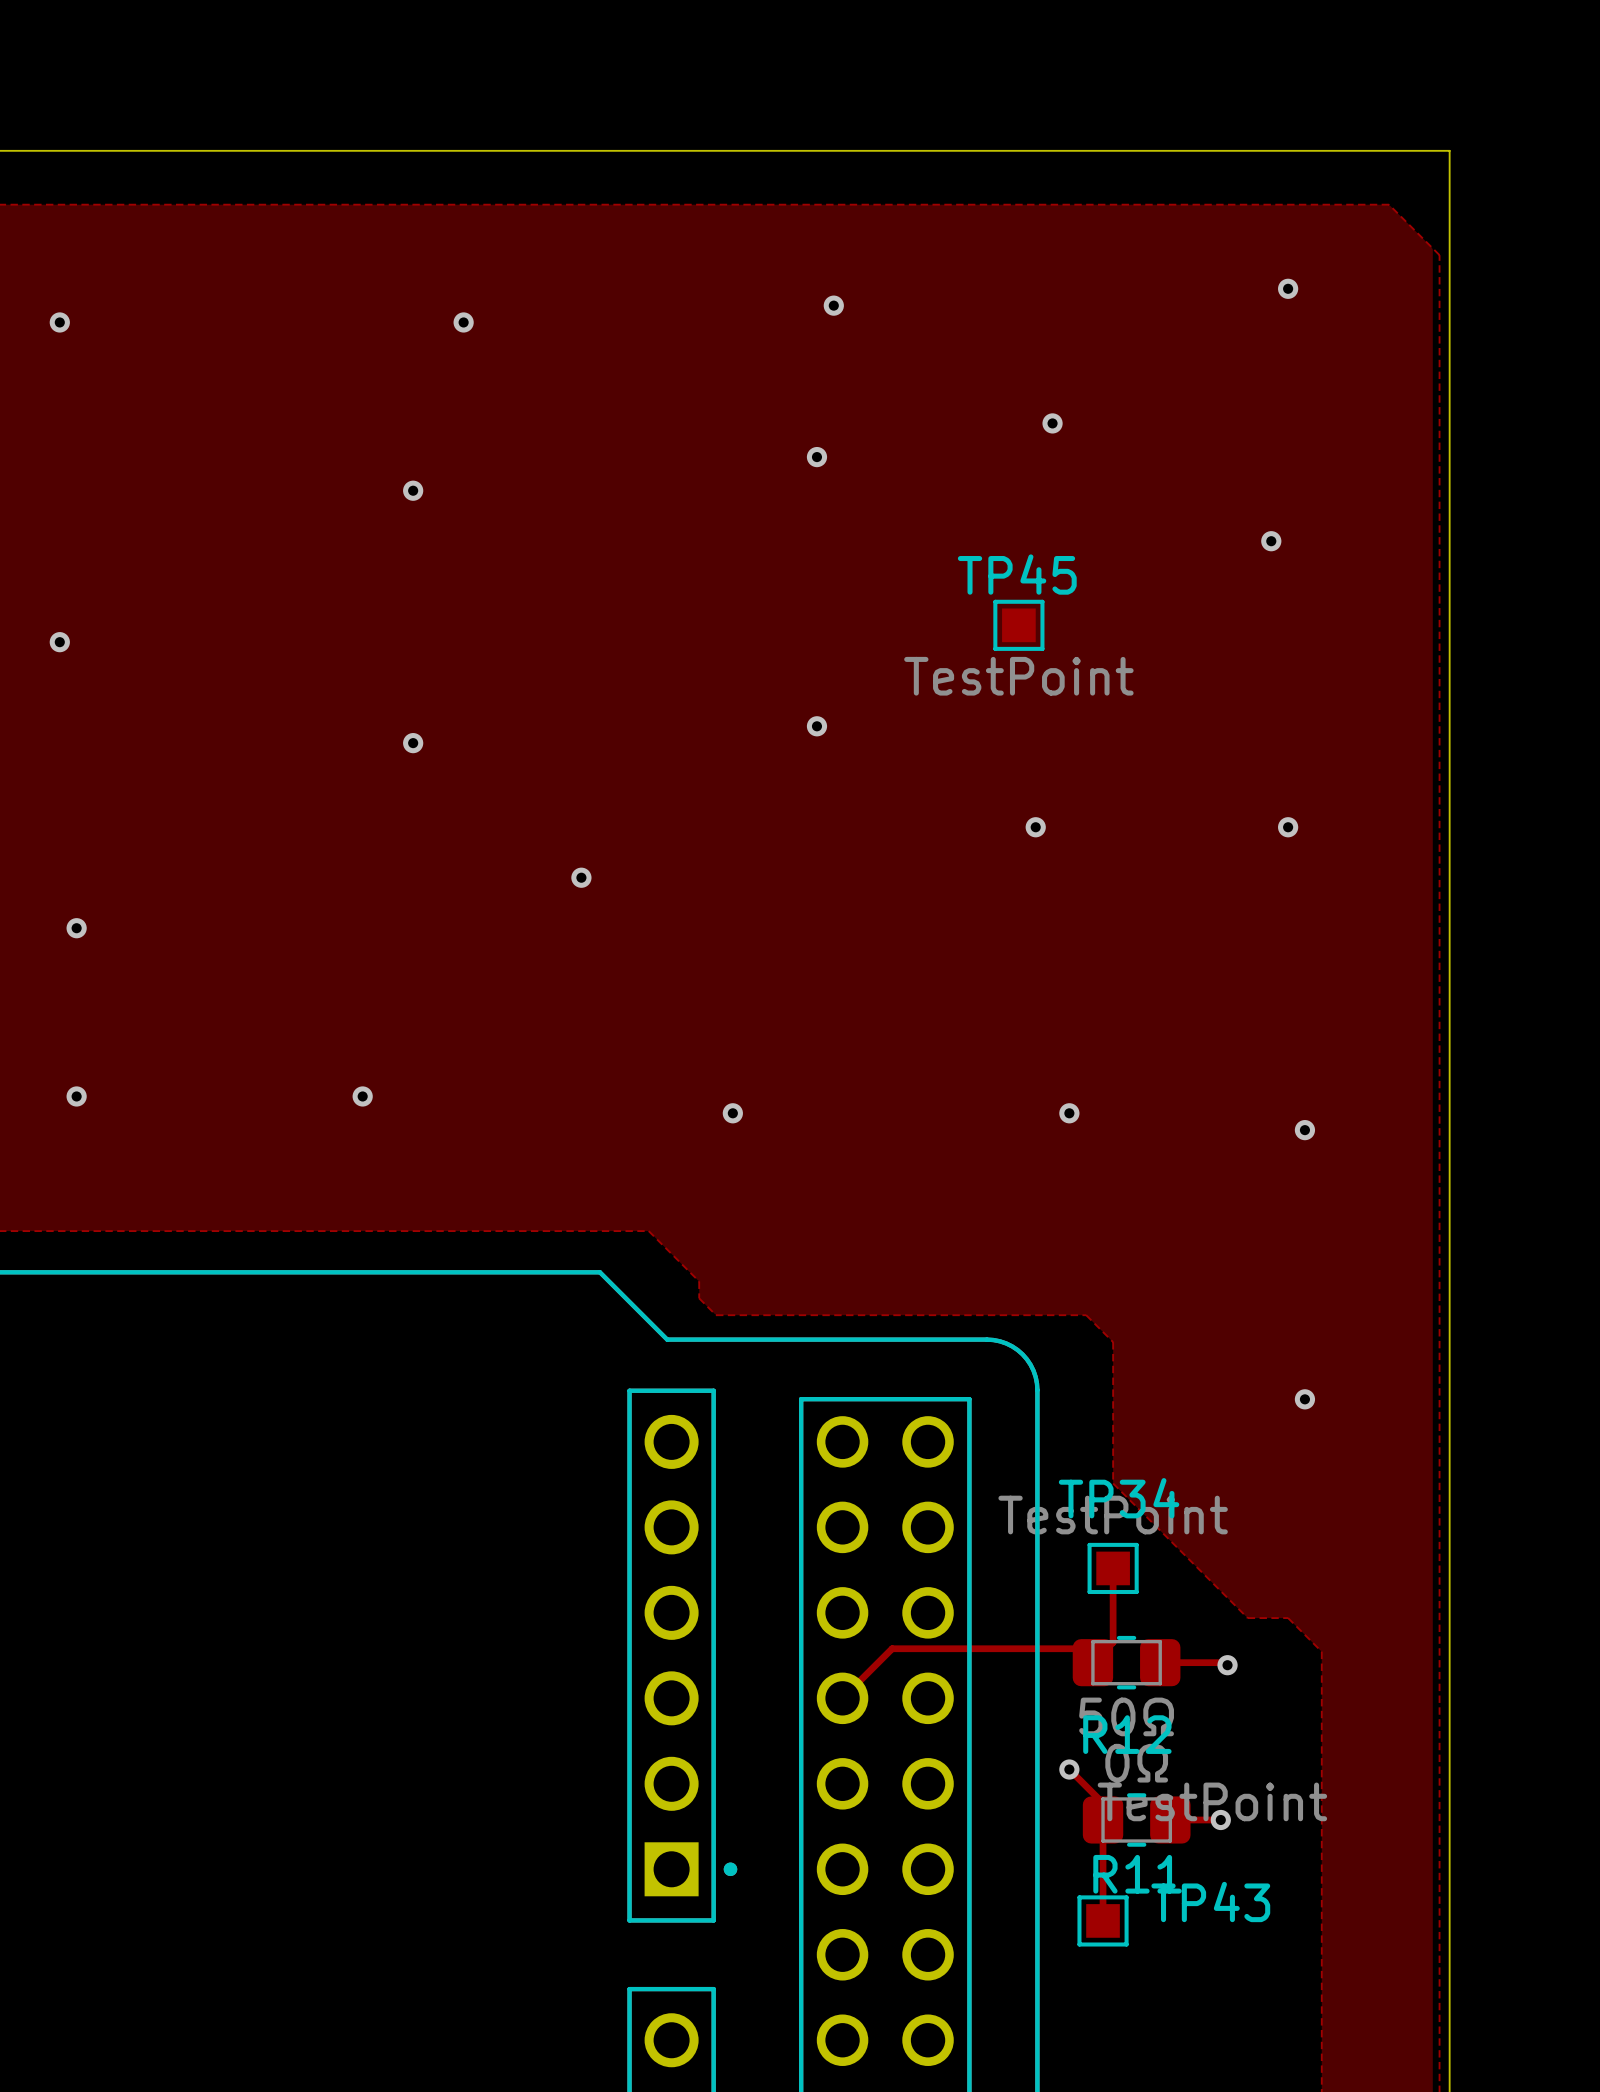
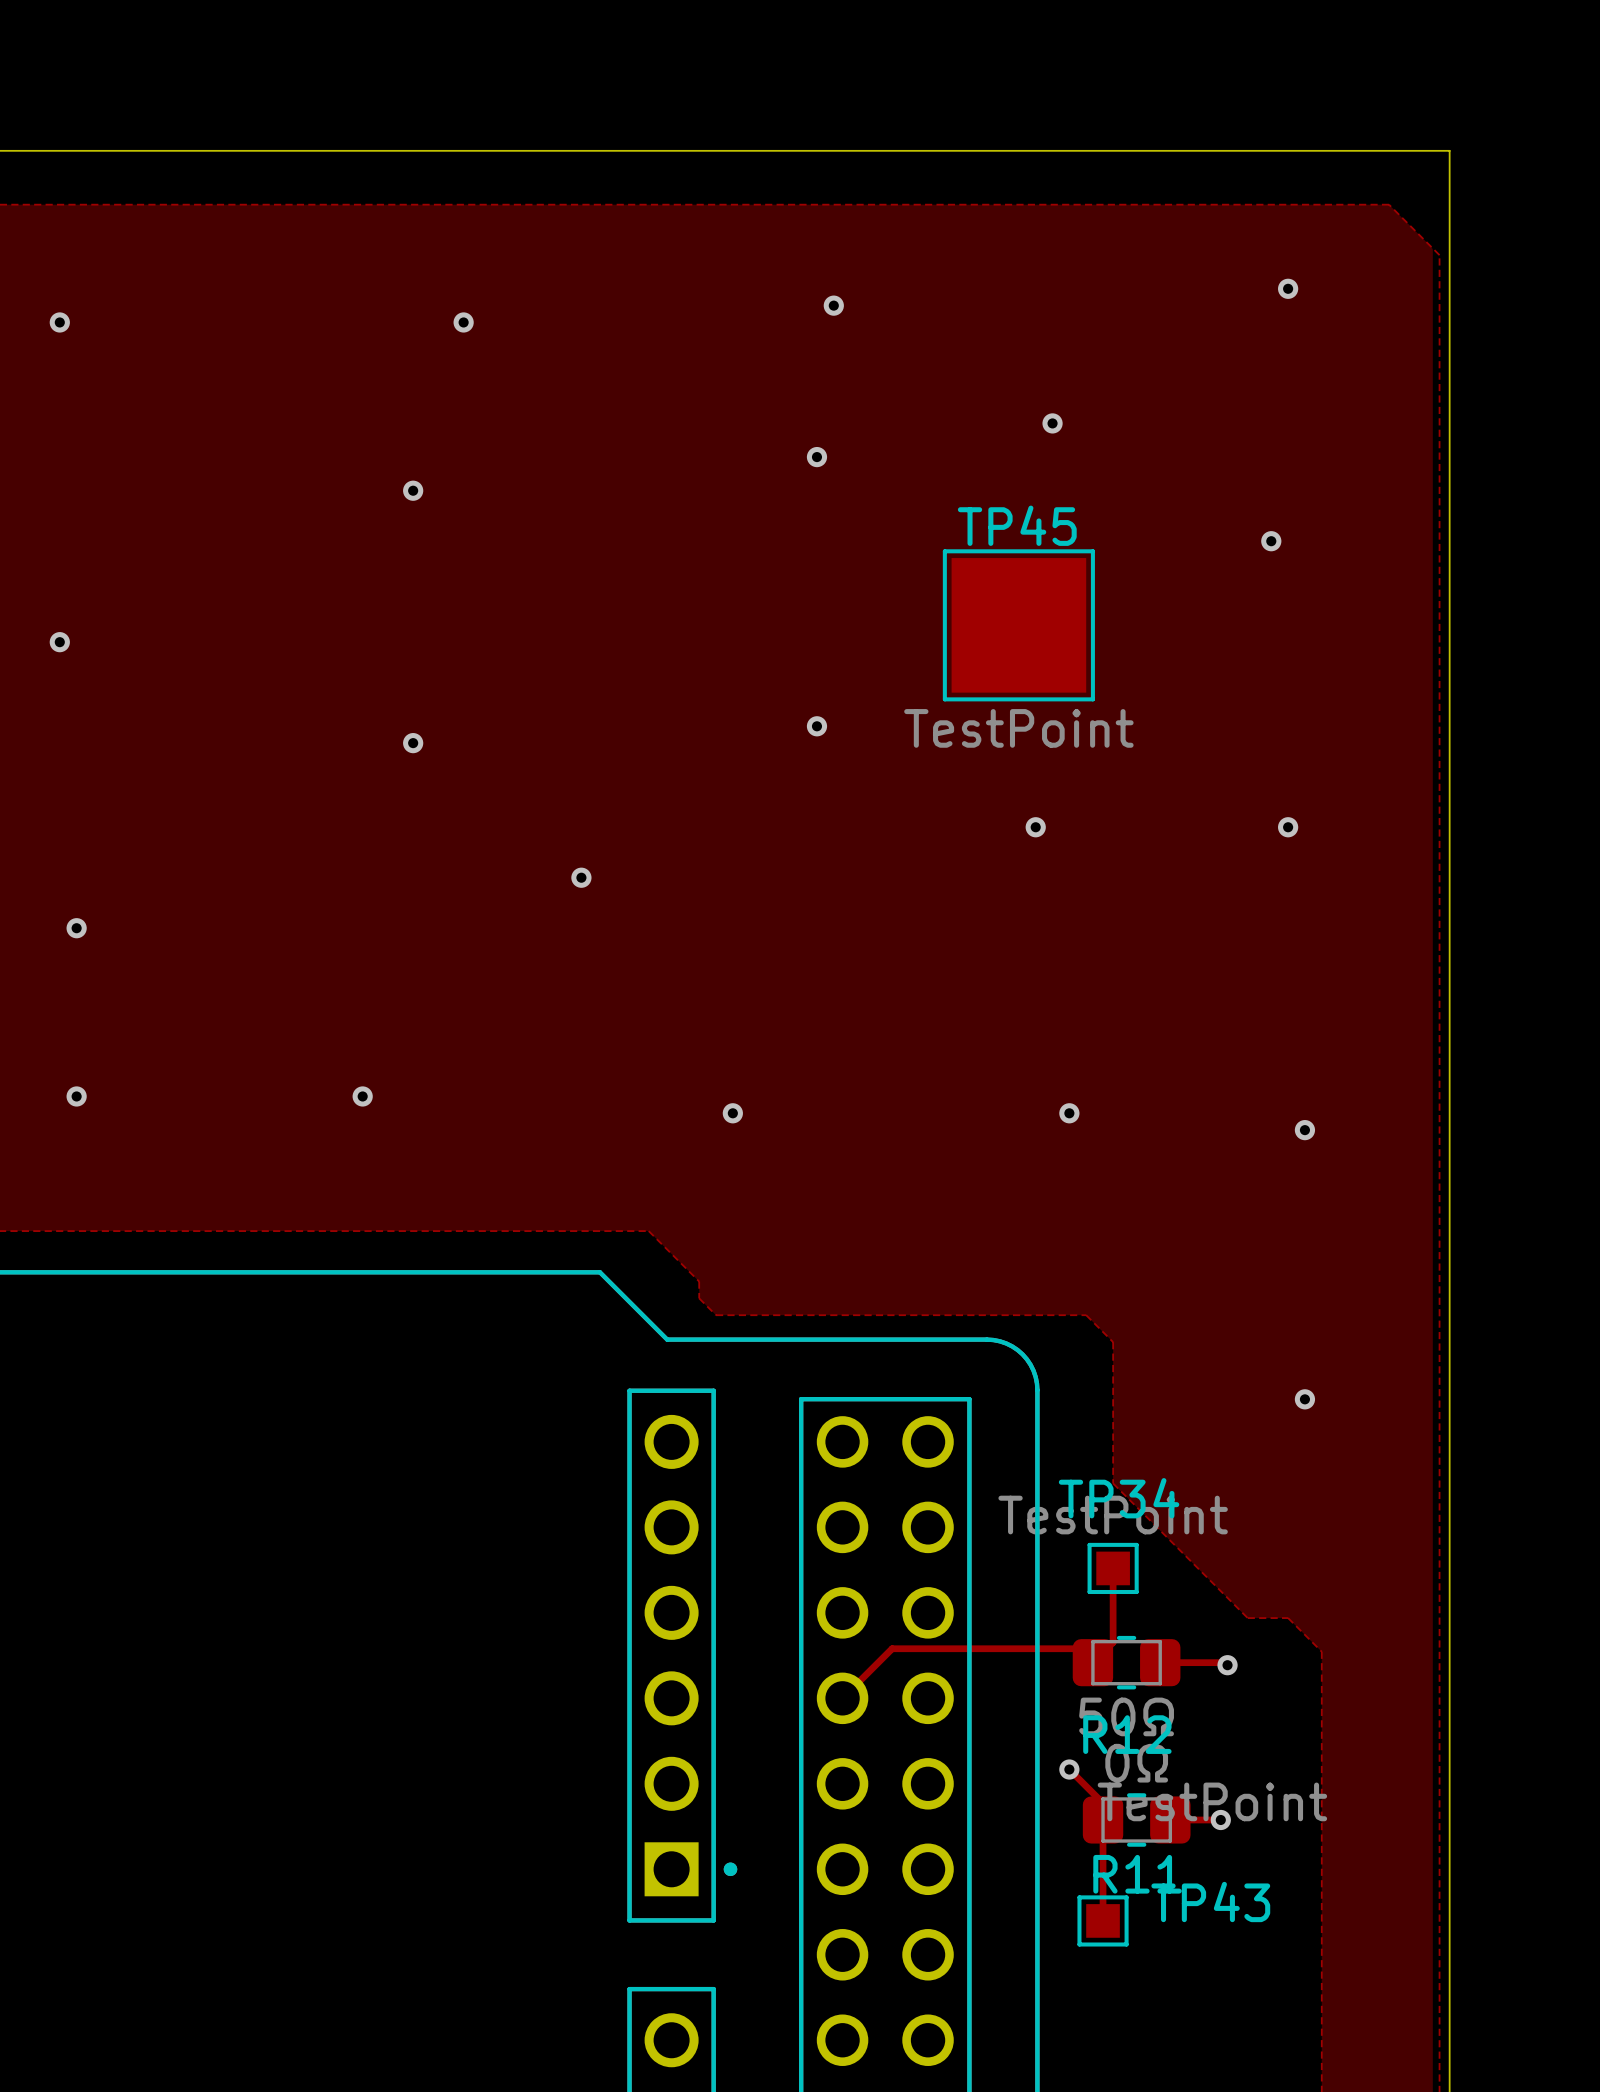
TP45 footprint: [993, 599, 1045, 651] -> [942, 549, 1095, 702]

